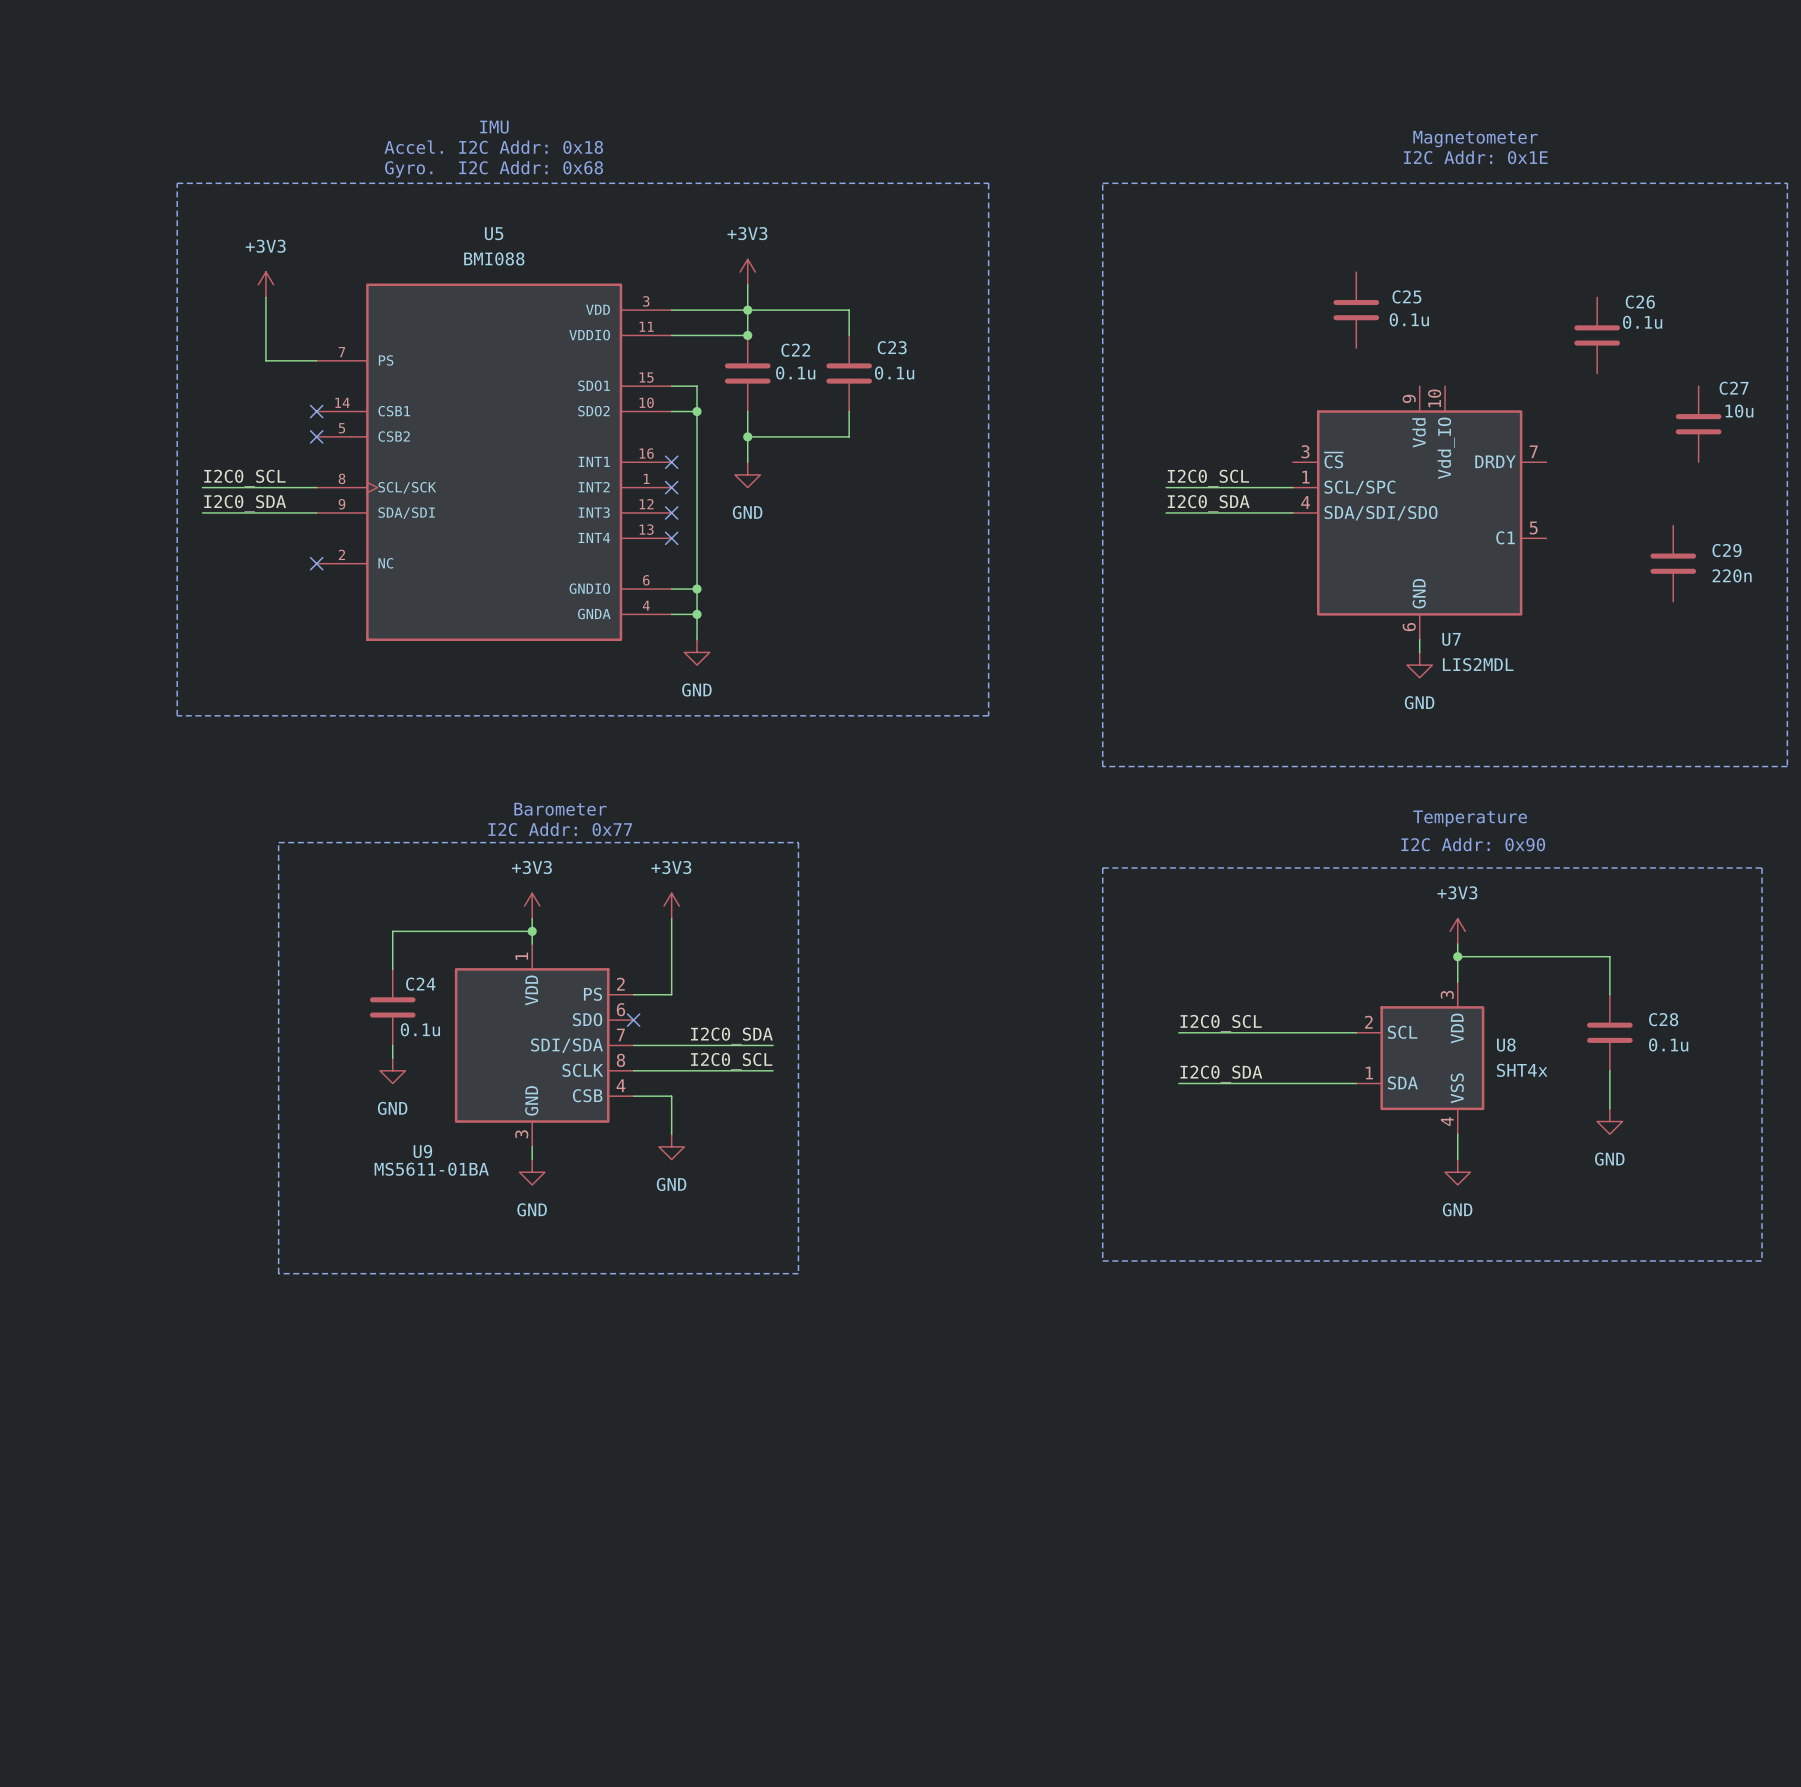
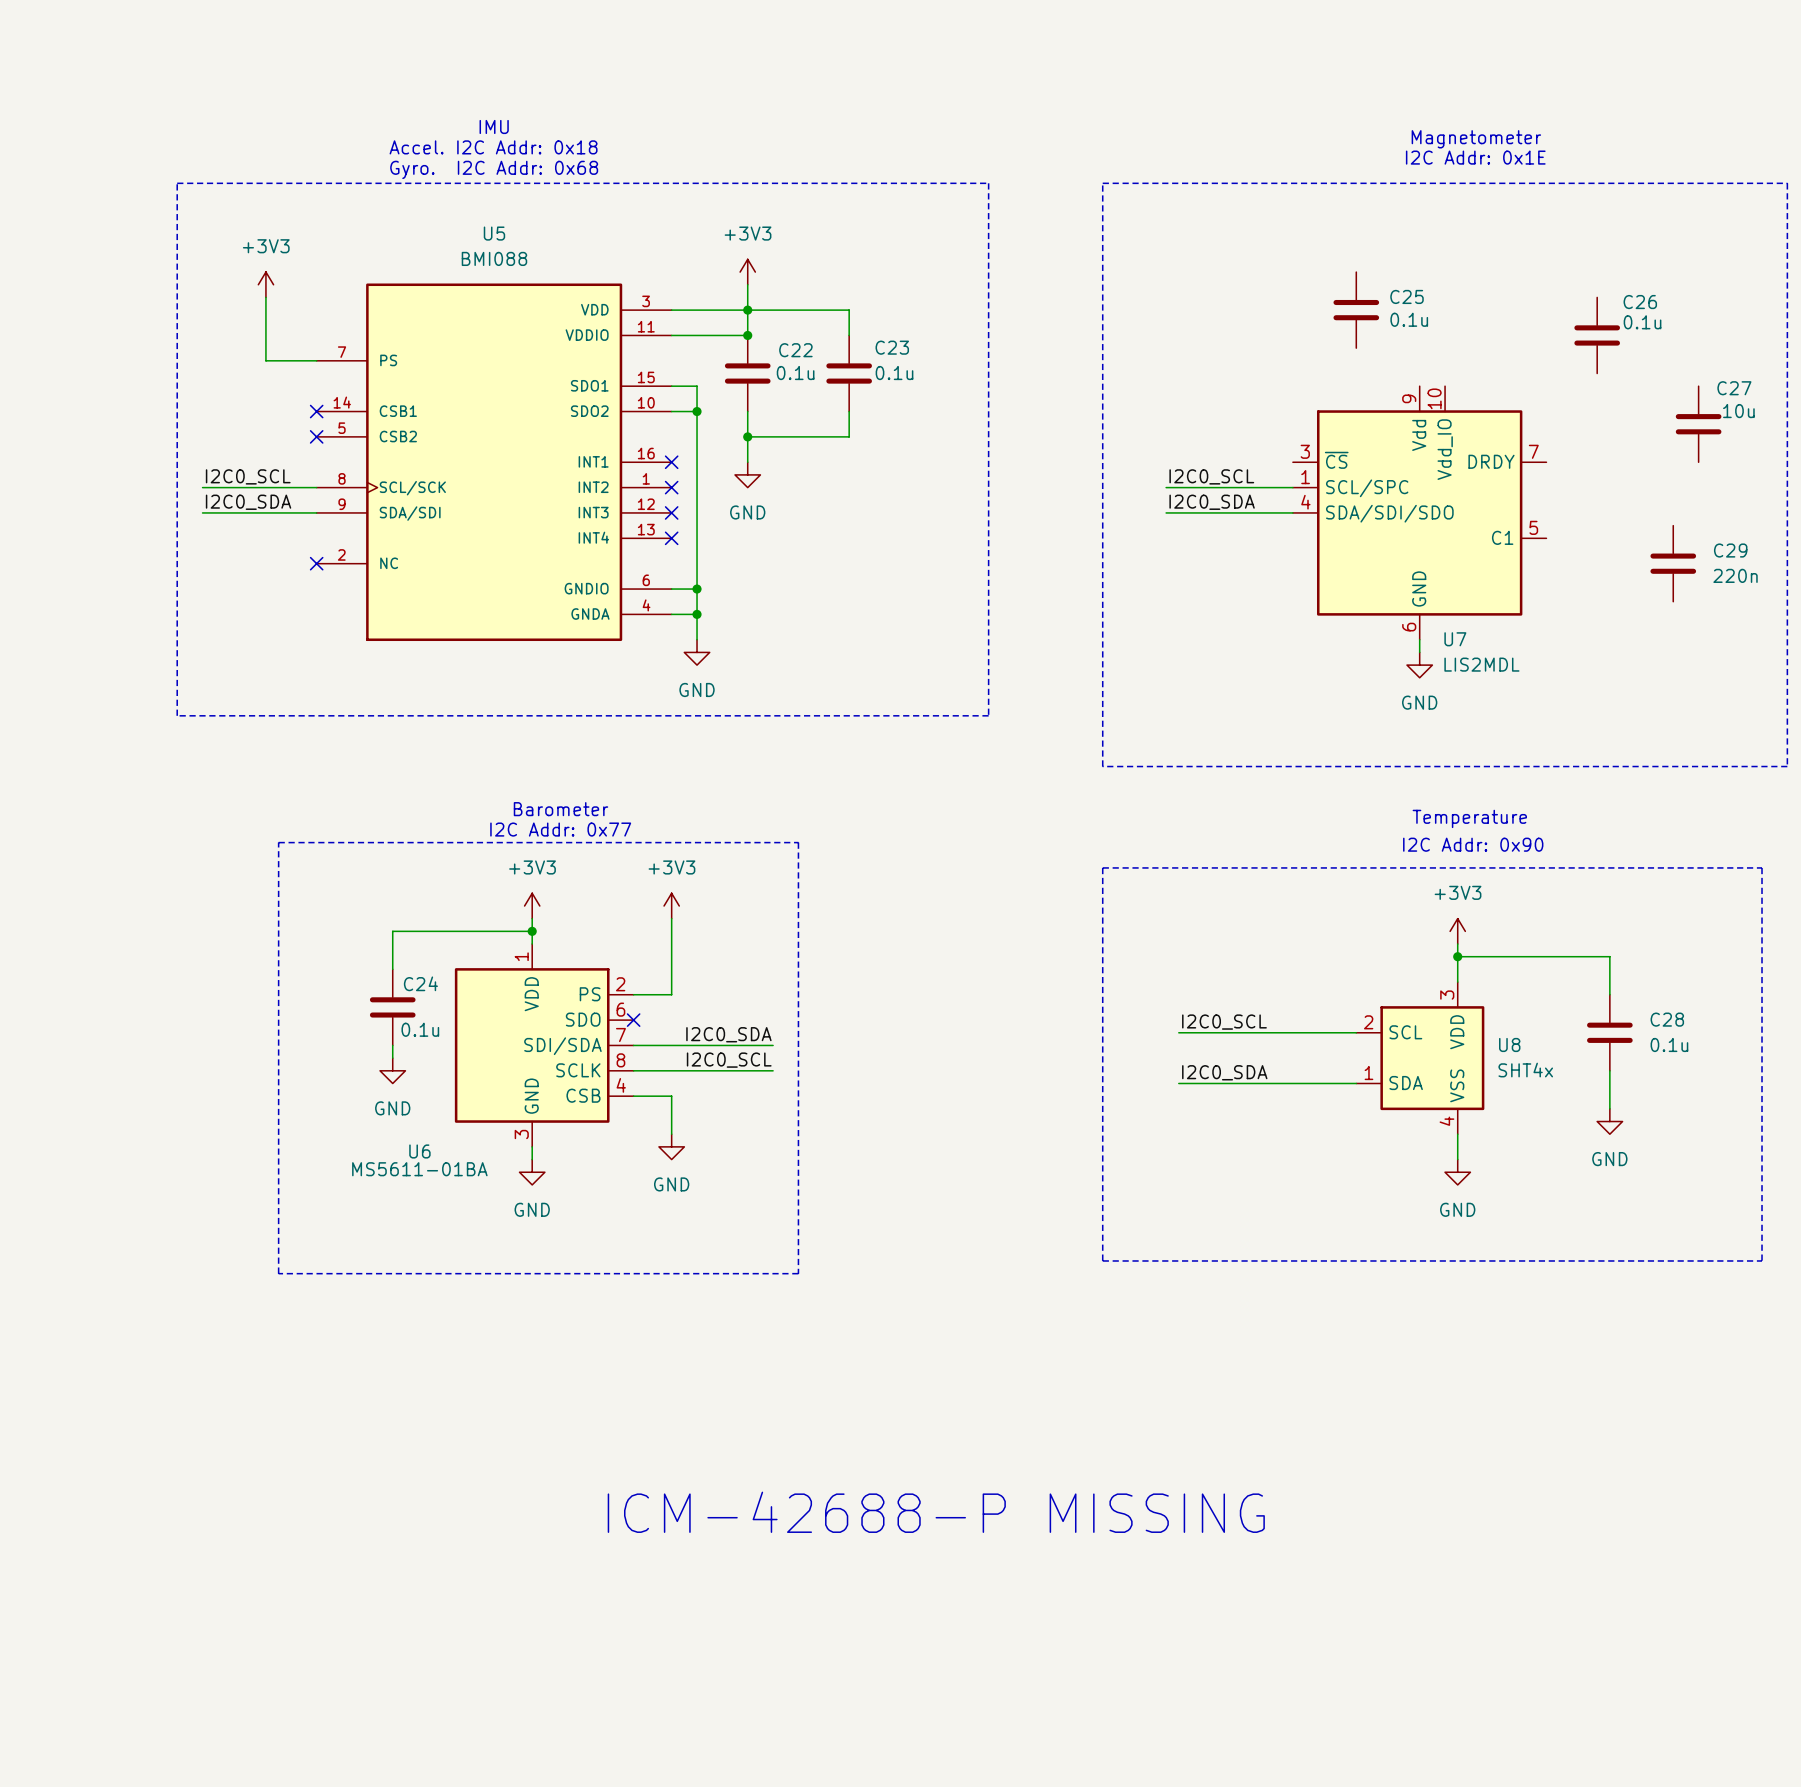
U9 name: U9 (422, 1151) -> U6 (419, 1151)
text: none -> ICM-42688-P MISSING (936, 1512)

